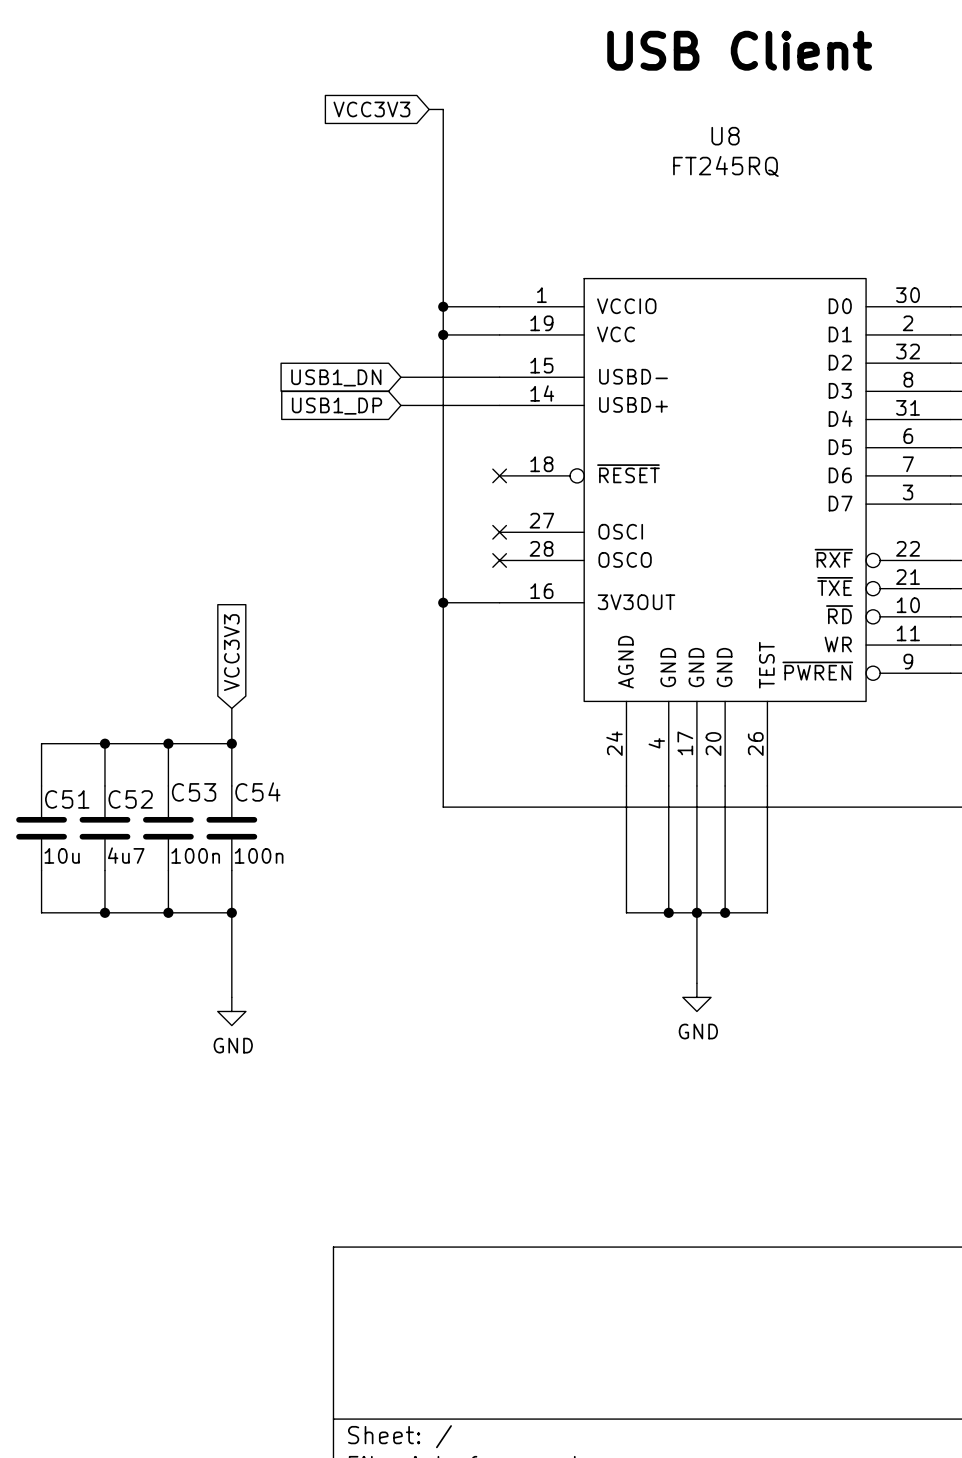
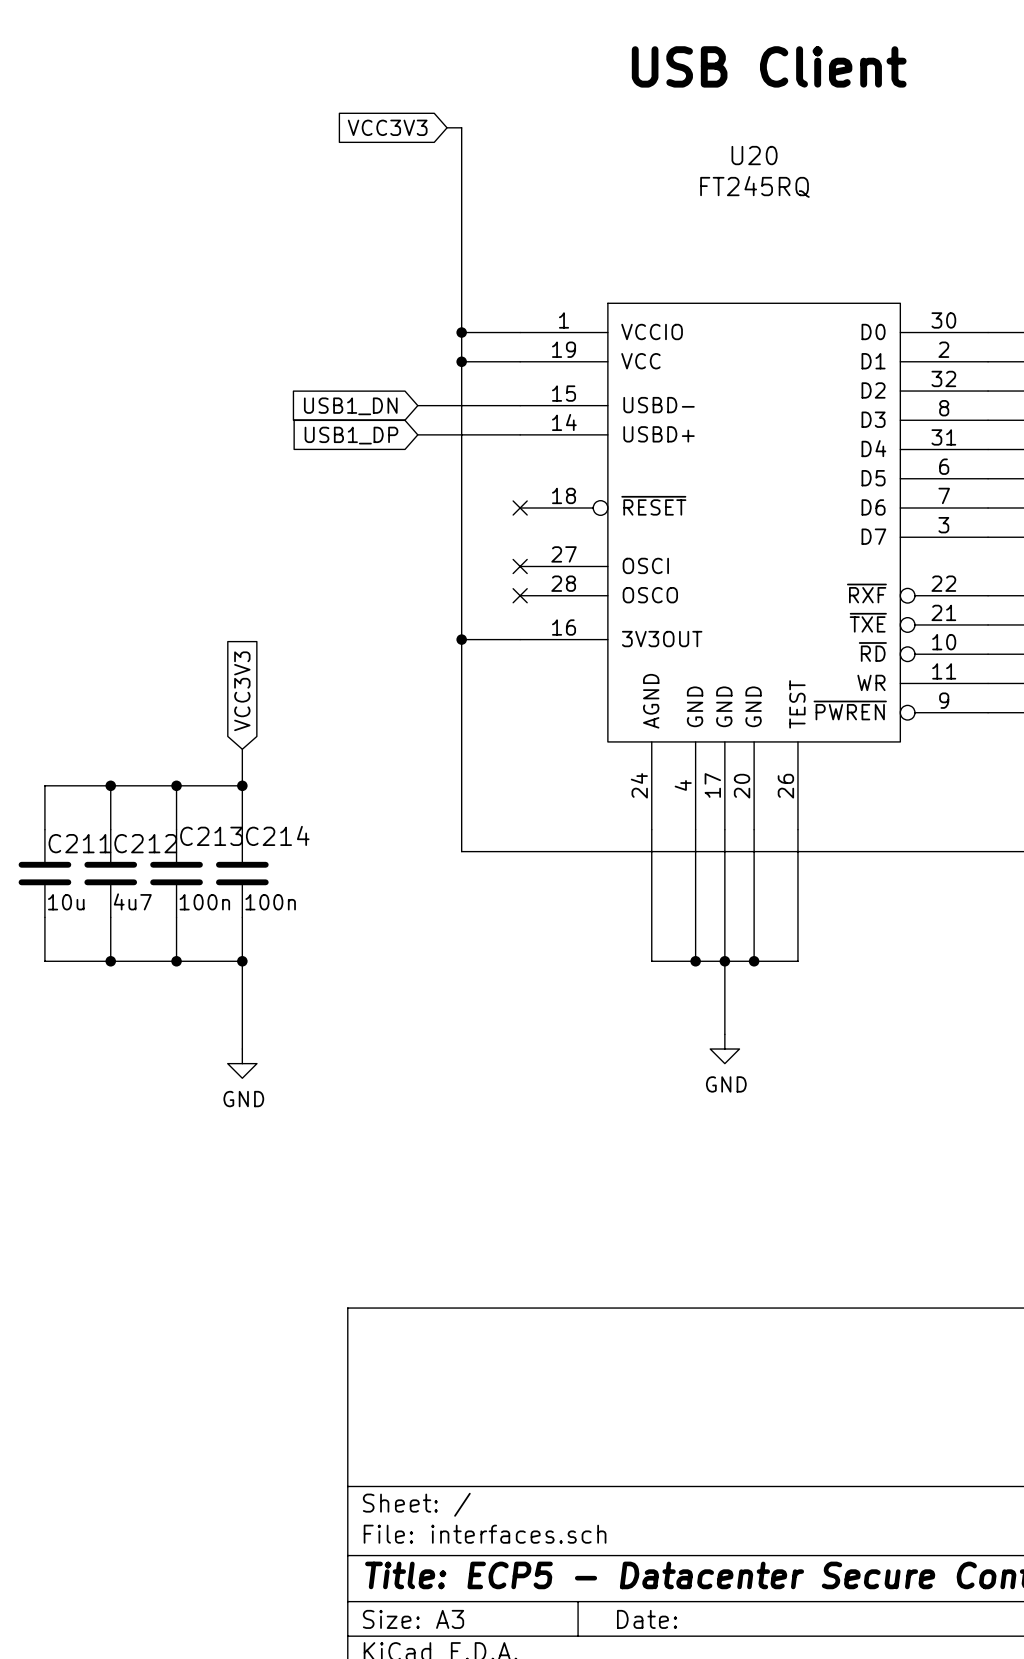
U8 name: U8 (725, 136) -> U20 (754, 155)
C54 name: C54 (257, 791) -> C214 (277, 835)
C53 name: C53 (194, 792) -> C213 (211, 836)
C51 name: C51 (67, 799) -> C211 (79, 843)
C52 name: C52 (130, 799) -> C212 (145, 843)

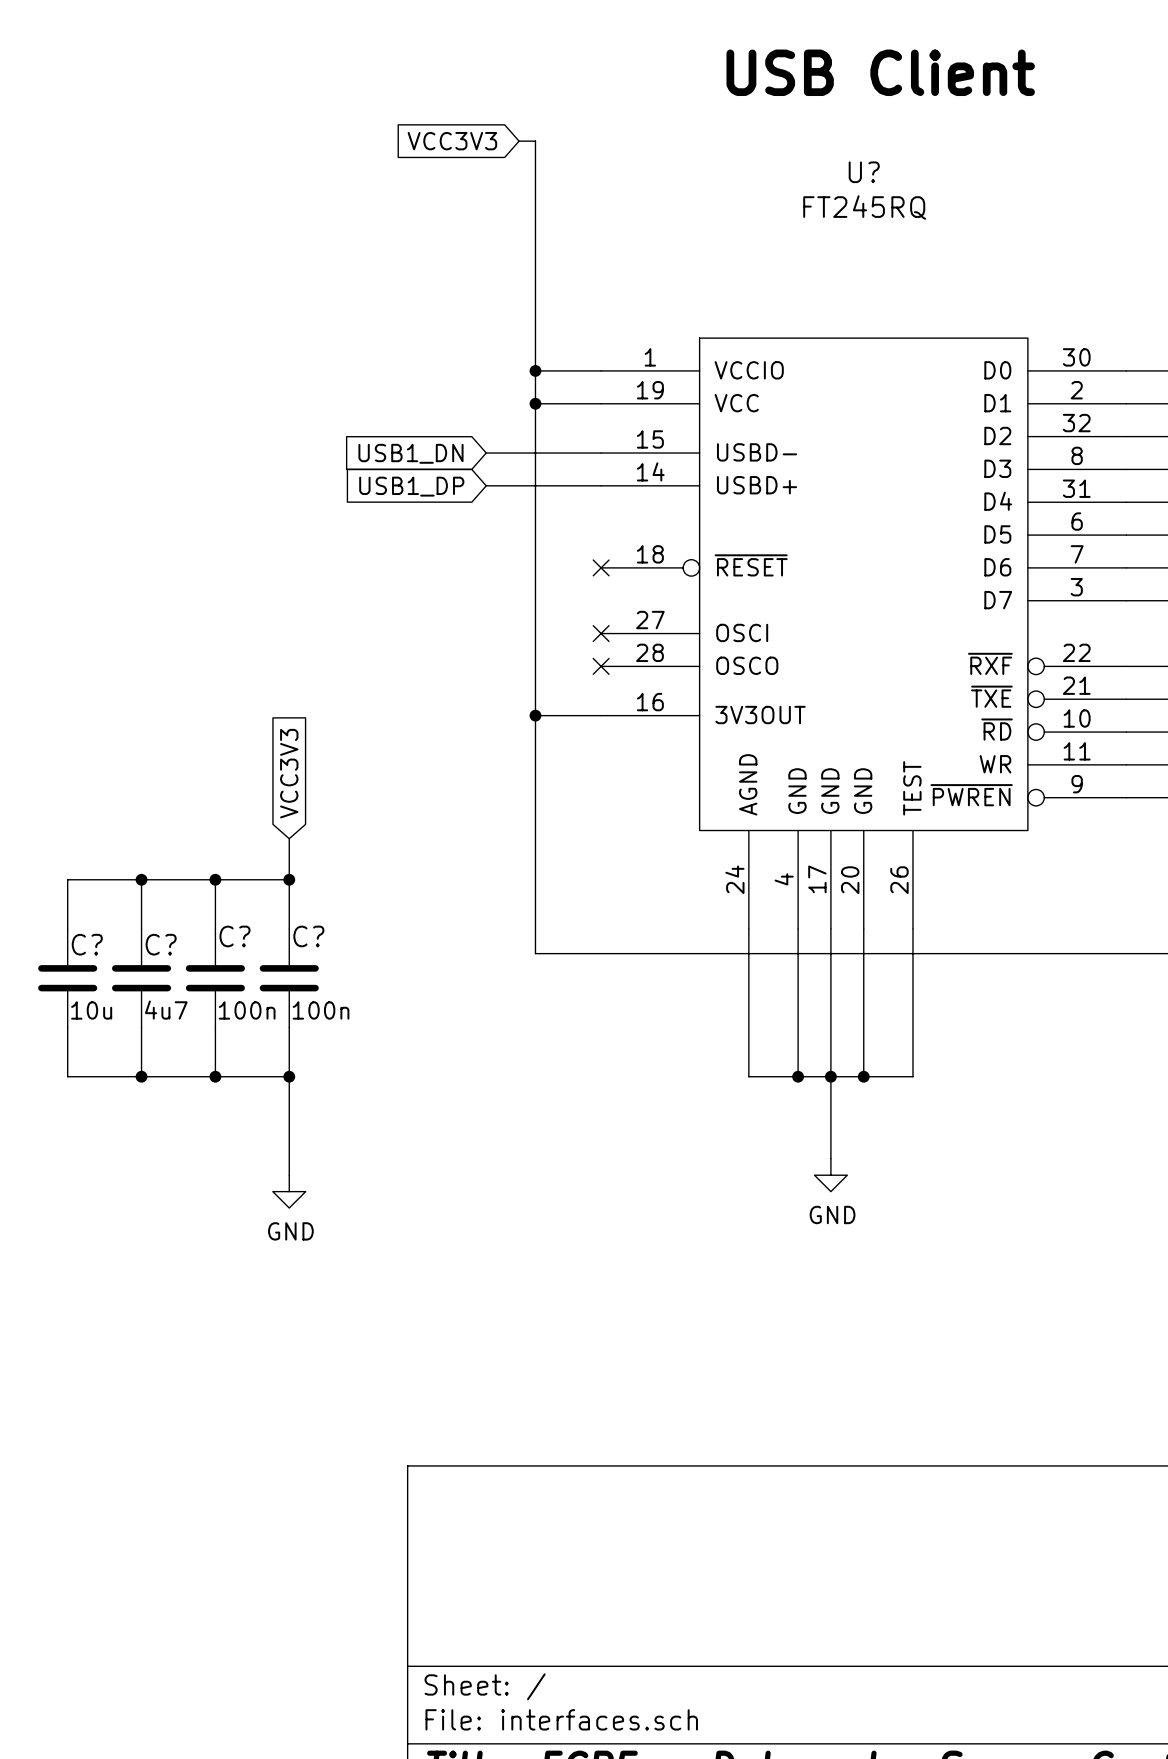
U20 name: U20 (754, 155) -> U? (864, 172)
C214 name: C214 (277, 835) -> C? (308, 936)
C213 name: C213 (211, 836) -> C? (234, 936)
C211 name: C211 (79, 843) -> C? (87, 944)
C212 name: C212 (145, 843) -> C? (161, 944)

